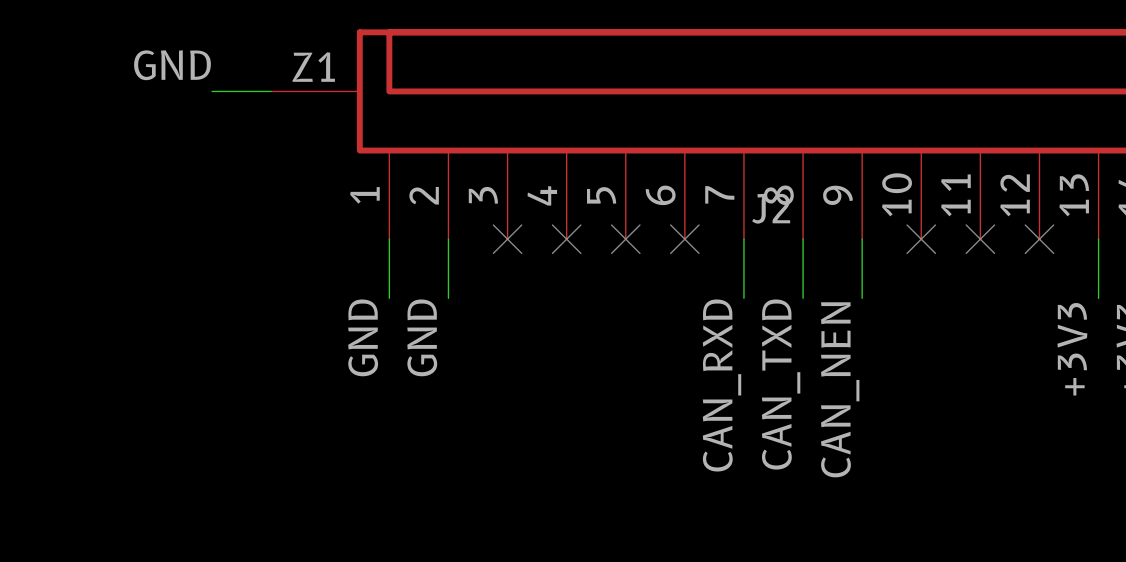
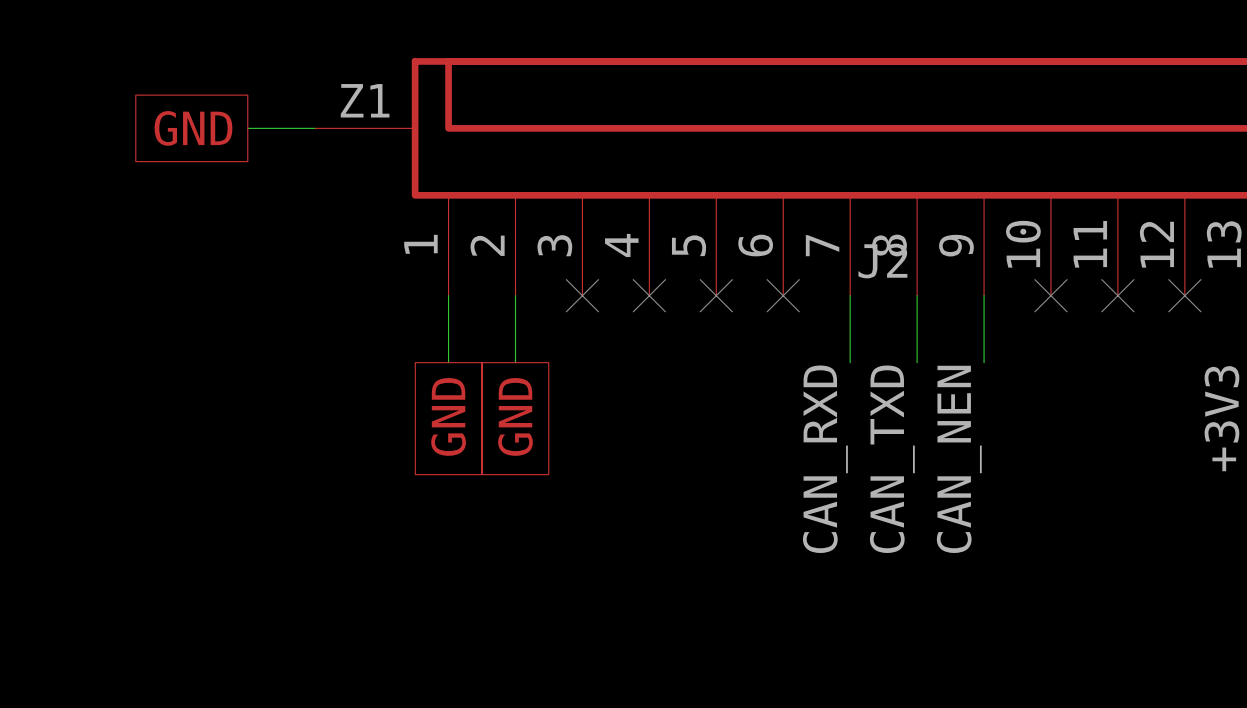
label: GND (172, 65) -> none
global label: none -> GND (193, 128)
label: GND (363, 337) -> none
label: GND (422, 337) -> none
global label: none -> GND (448, 416)
global label: none -> GND (515, 416)

